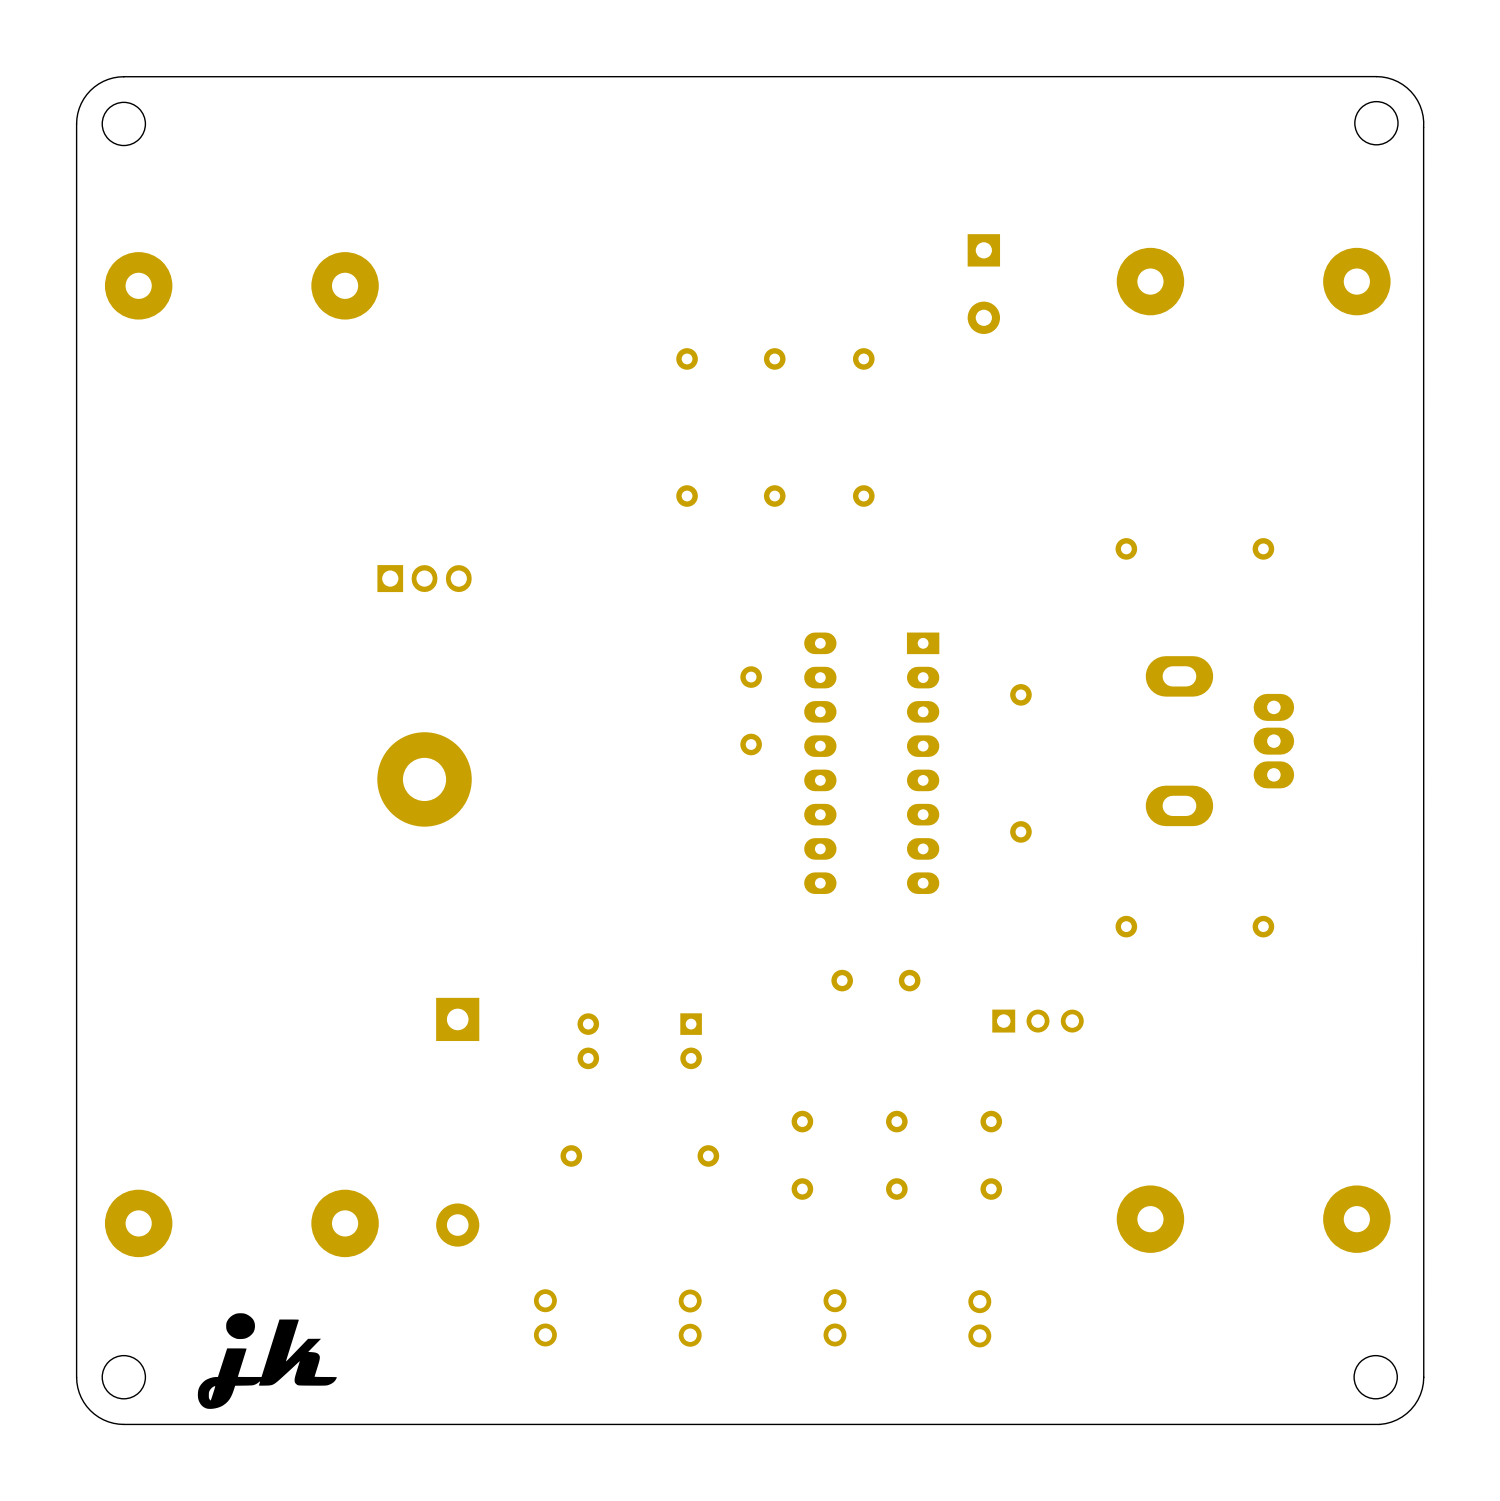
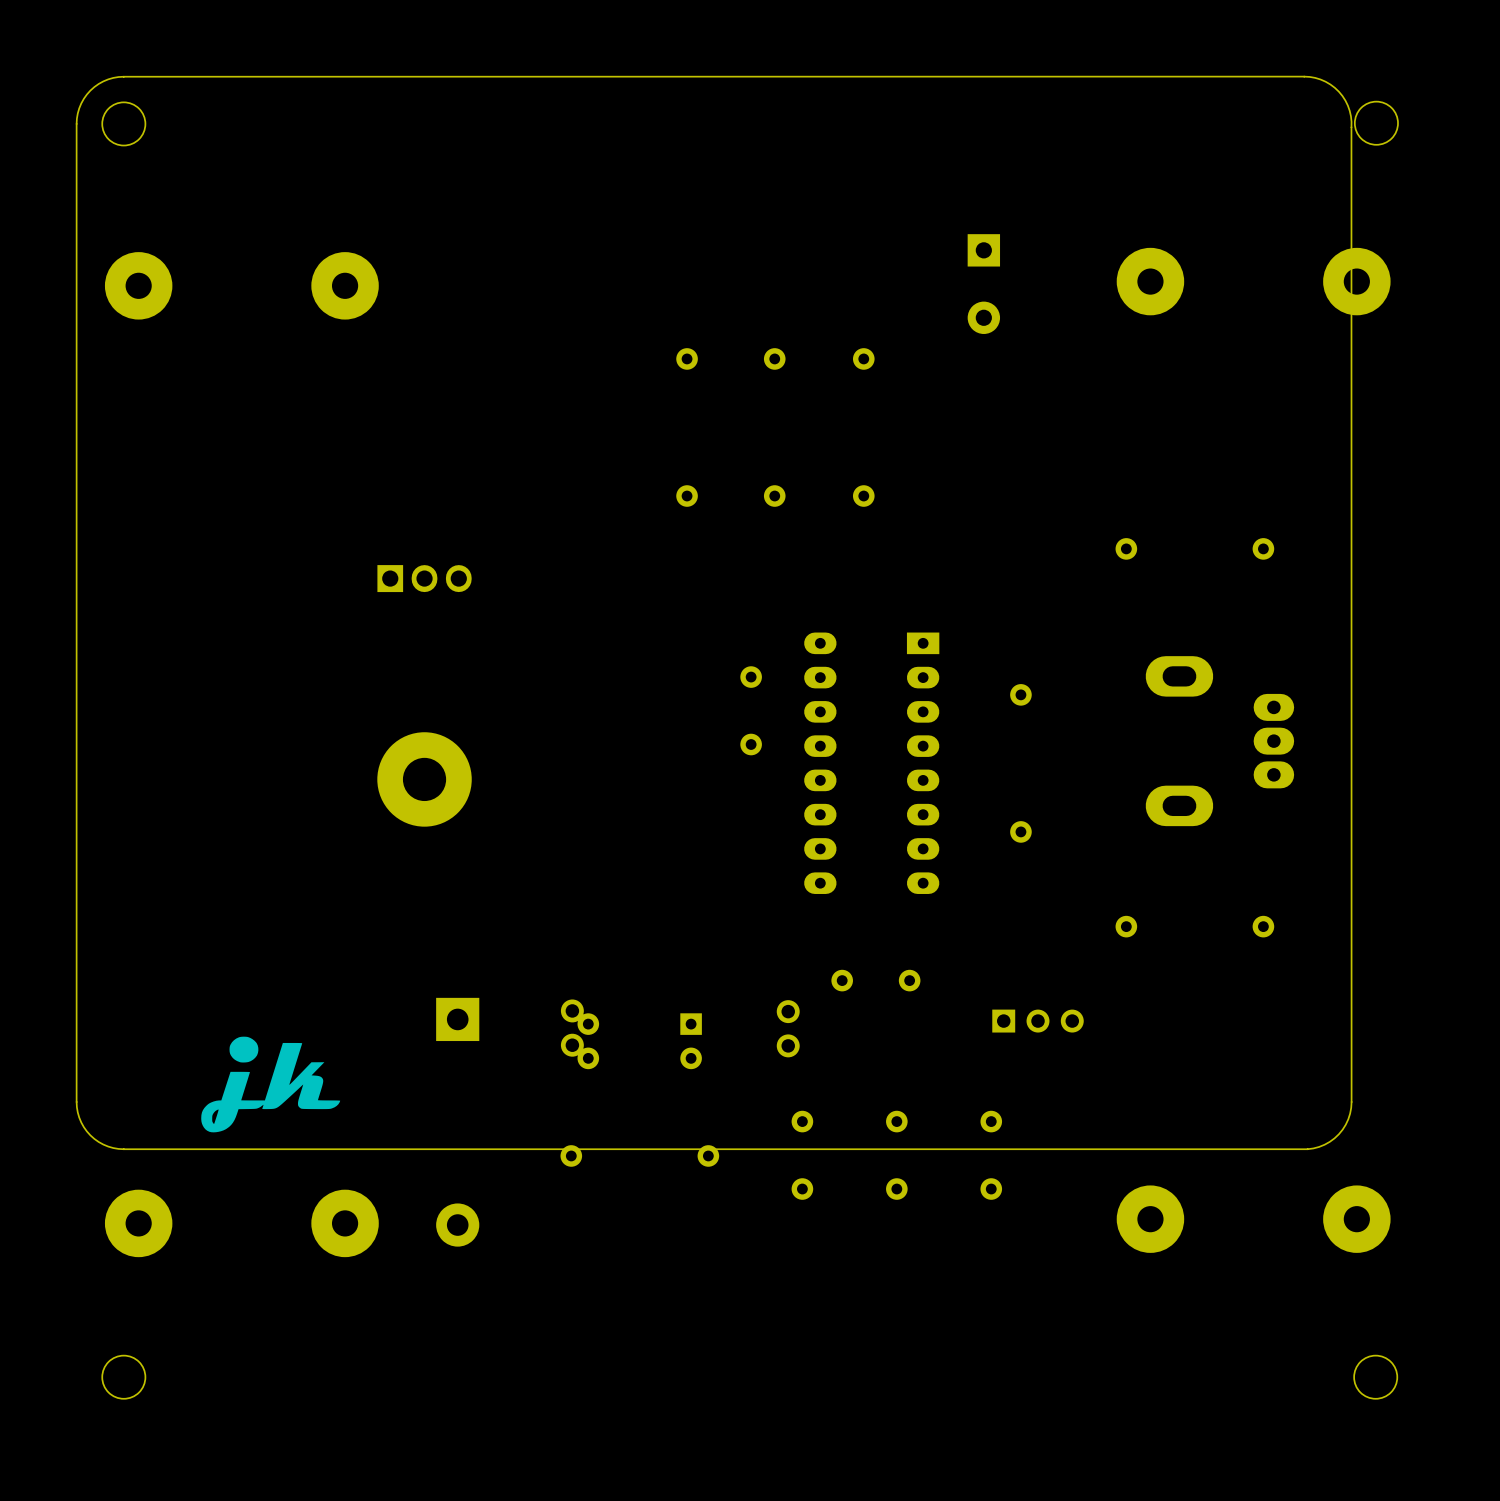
board edge: (1304, 76) (1376, 76) (1392, 79) (1402, 84) (1414, 95) (1421, 110) (1423, 121) (1423, 1377) (1417, 1399) (1406, 1413) (1391, 1422) (1379, 1424) (113, 1423) (98, 1417) (86, 1406) (81, 1397) (76, 1382) (76, 1102) -> (1304, 76) (1325, 81) (1338, 91) (1347, 105) (1351, 121) (1351, 1102) (1345, 1124) (1334, 1138) (1324, 1144) (1307, 1149) (123, 1149) (108, 1146) (90, 1135) (81, 1122) (76, 1102)
part: none -> (572, 1028)
part: none -> (788, 1028)
part: (545, 1317) -> none
part: (835, 1317) -> none
part: (690, 1318) -> none
part: (979, 1318) -> none
drawing position: (267, 1361) -> (270, 1084)

